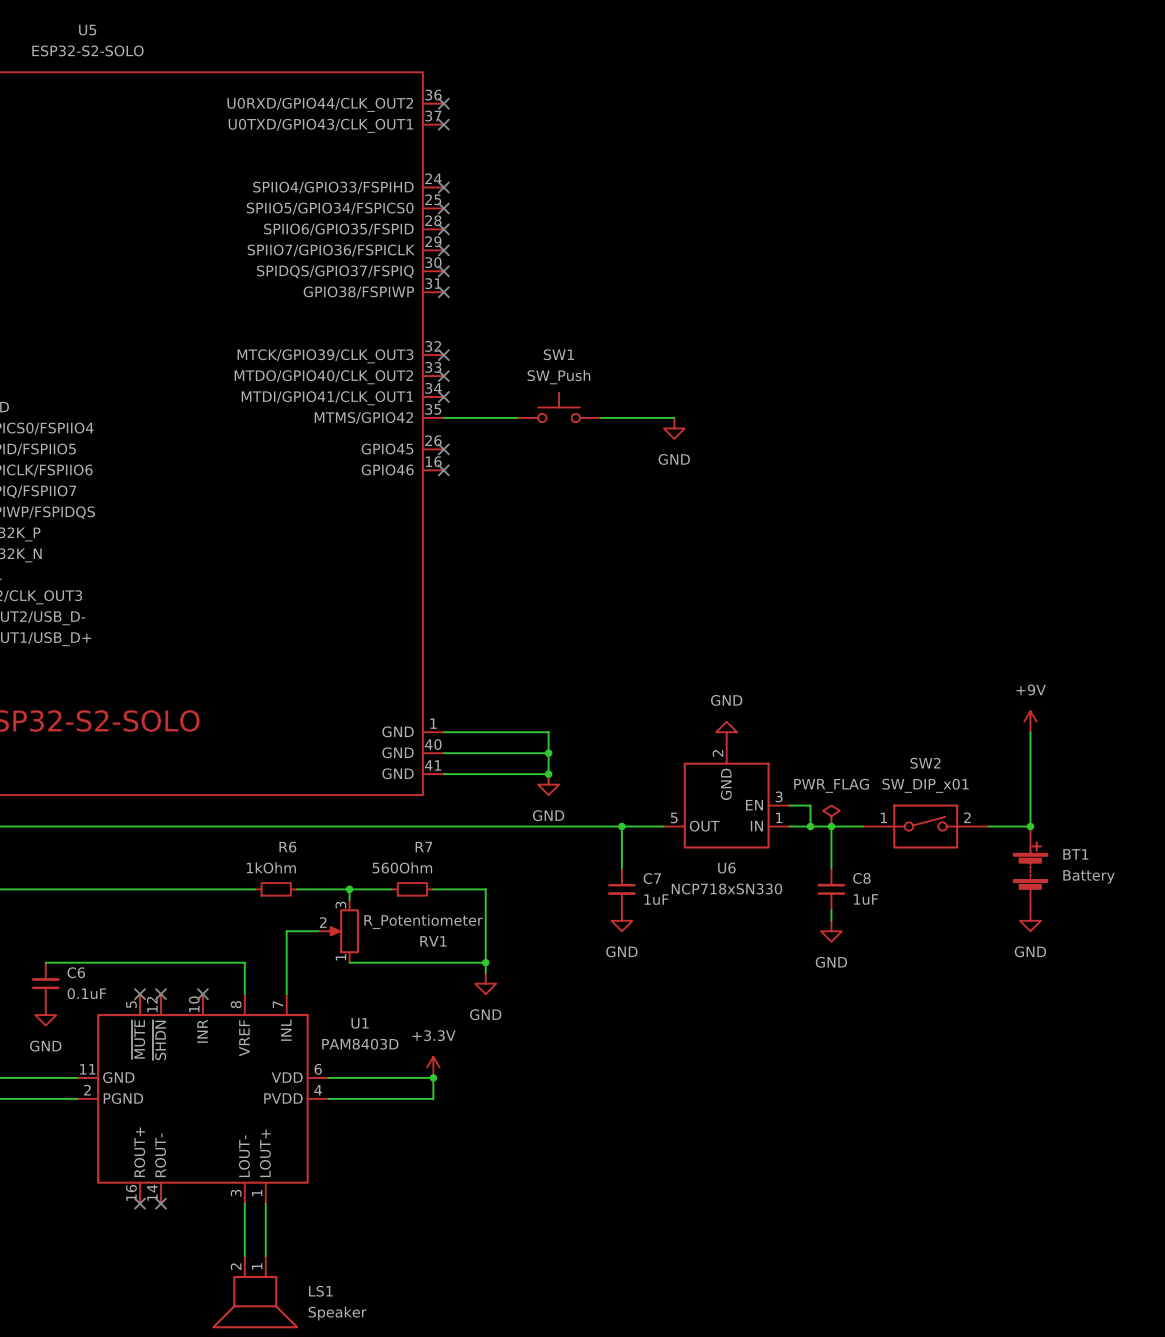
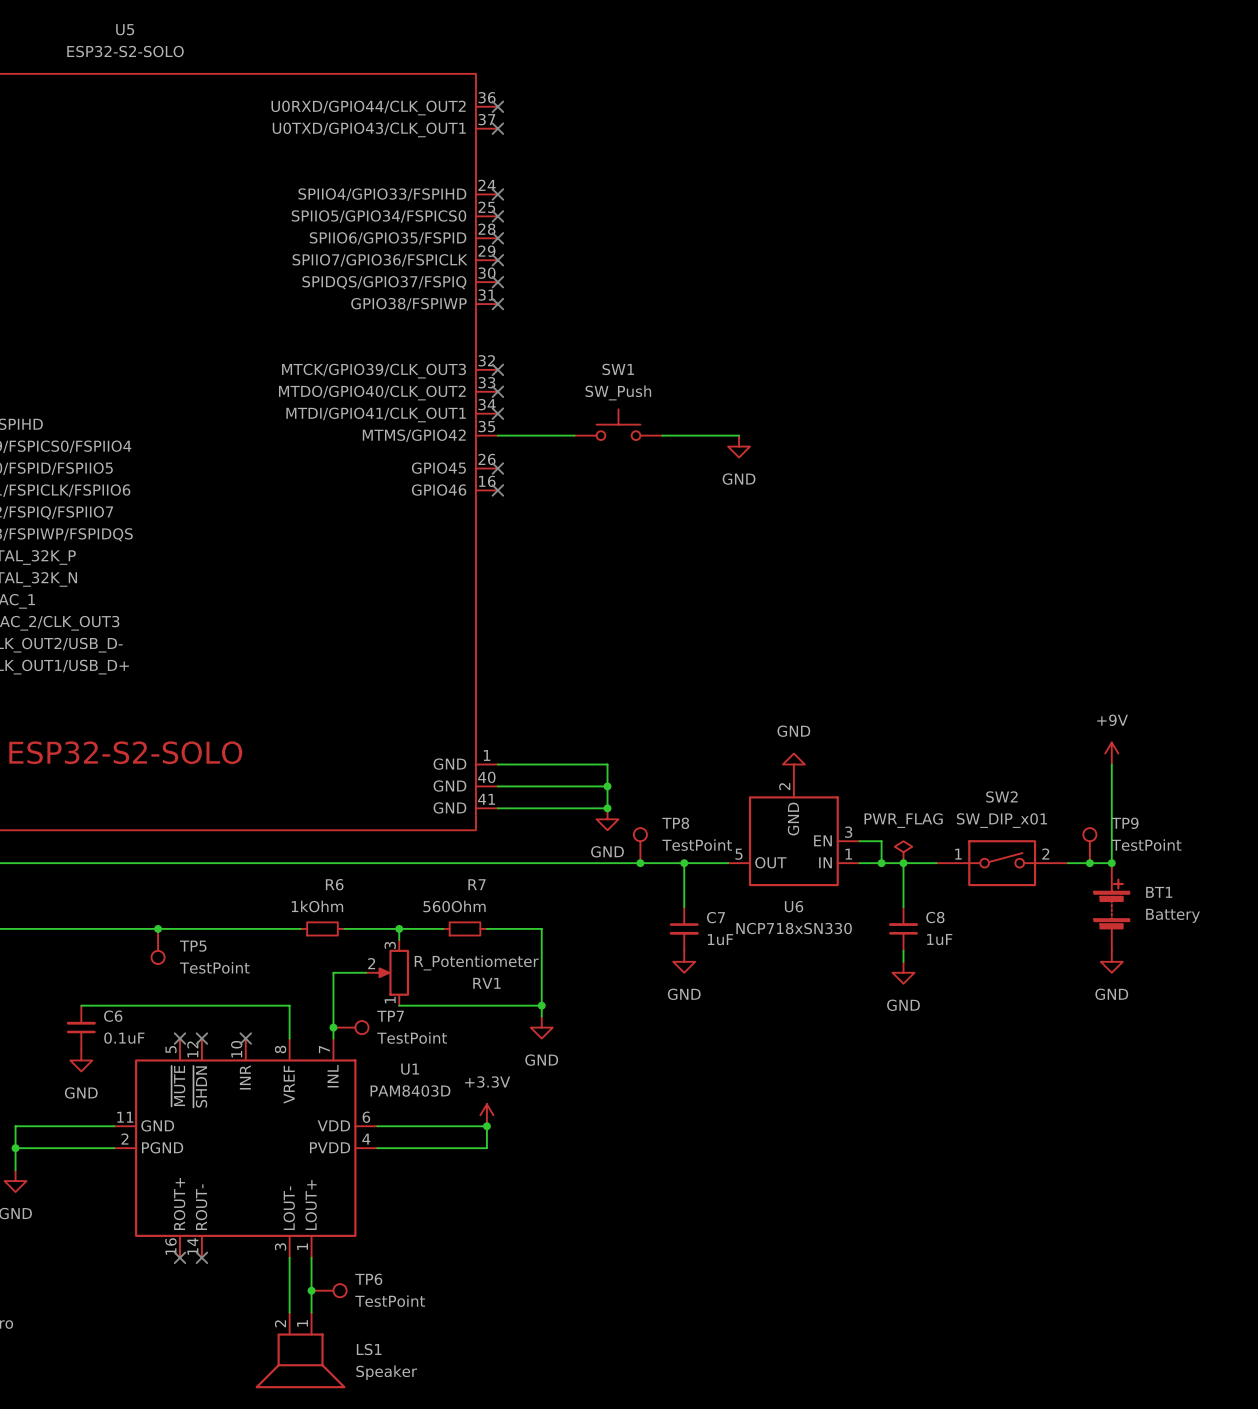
TP8: none -> TestPoint (640, 845)
TP9: none -> TestPoint (1089, 845)
junction: none -> (640, 863)
junction: none -> (1089, 863)
junction: none -> (158, 928)
TP5: none -> TestPoint (158, 946)
junction: none -> (333, 1027)
TP7: none -> TestPoint (351, 1027)
junction: none -> (311, 1290)
TP6: none -> TestPoint (329, 1290)

